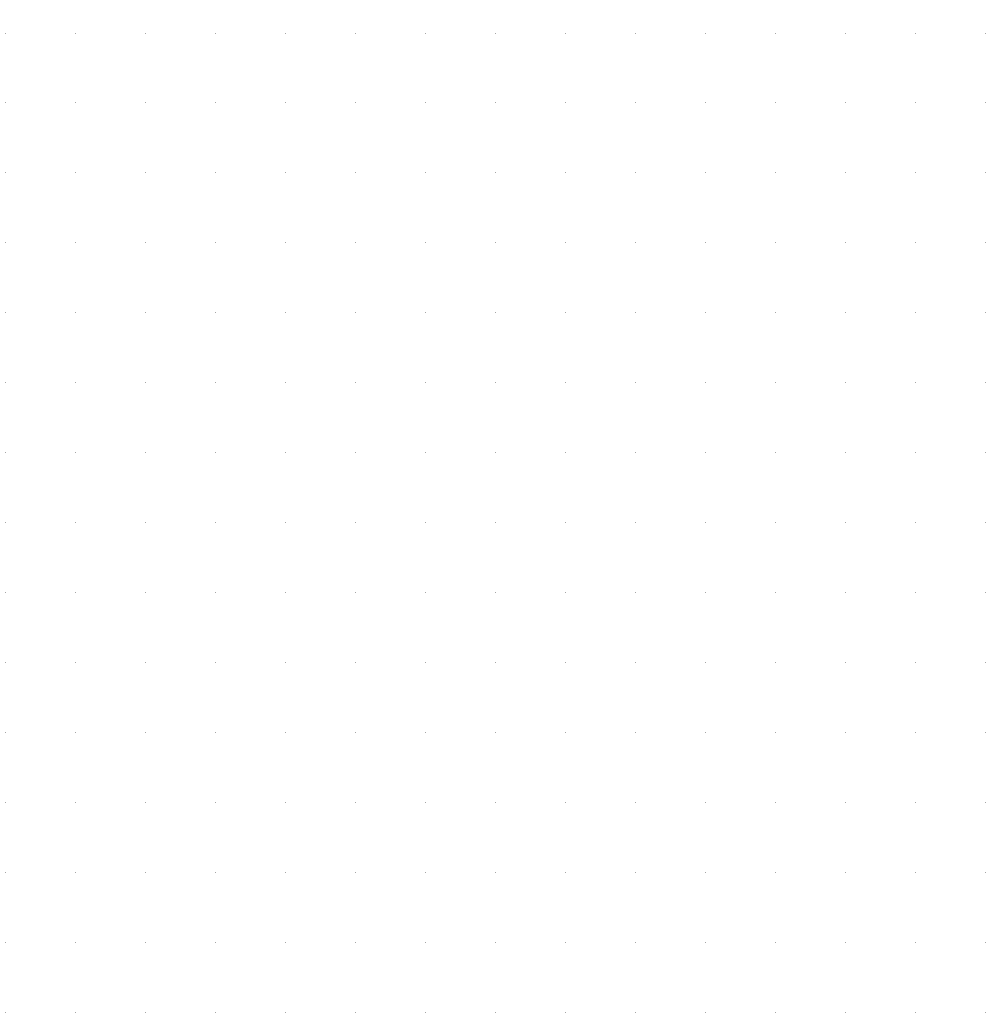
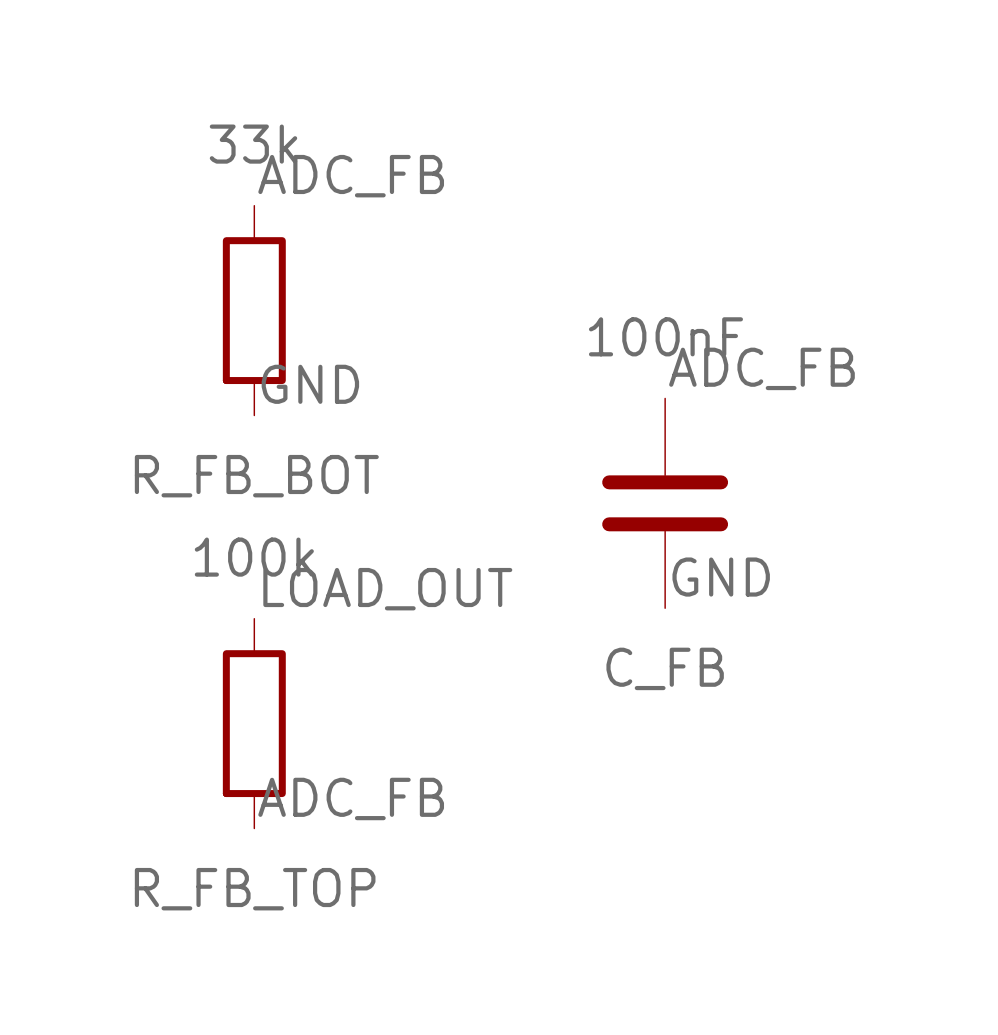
label: none -> ADC_FB (351, 176)
R_FB_BOT: none -> 33k (254, 310)
label: none -> ADC_FB (761, 368)
label: none -> GND (310, 384)
C_FB: none -> 100nF (665, 503)
label: none -> GND (721, 577)
label: none -> LOAD_OUT (387, 589)
R_FB_TOP: none -> 100k (254, 723)
label: none -> ADC_FB (351, 798)

